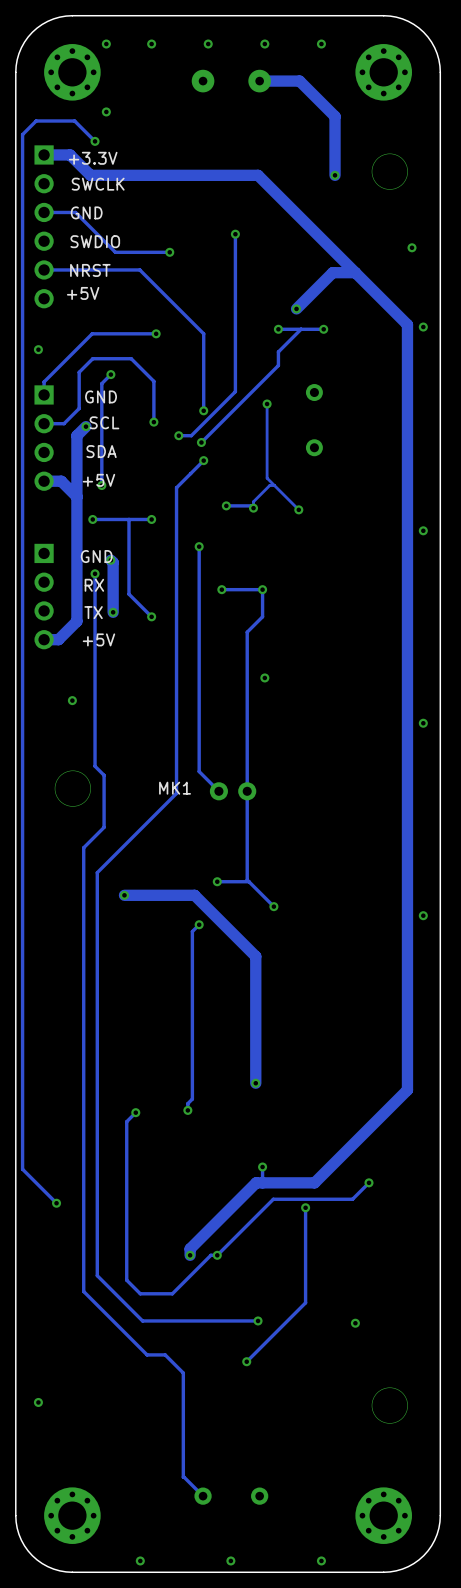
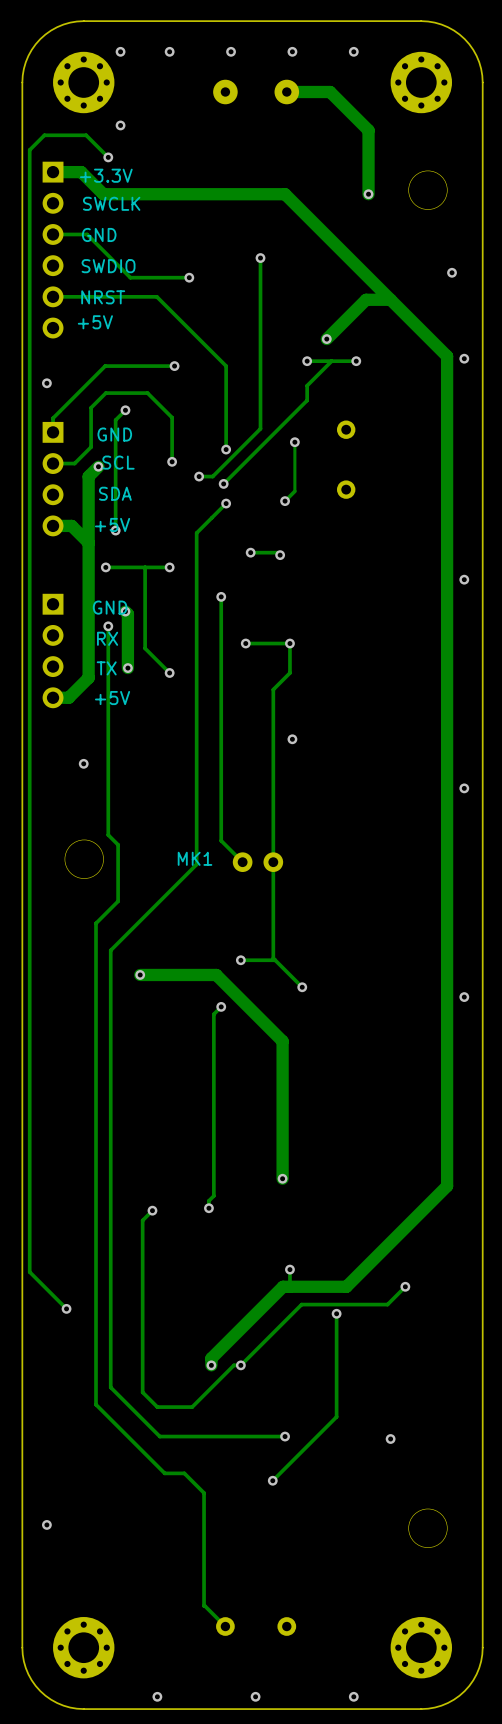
track: (267, 449) (267, 478) (298, 509) -> (294, 491) (285, 501)
track: (274, 485) (269, 485) (253, 501) (253, 508) -> none
via position: (298, 509) -> (285, 501)

